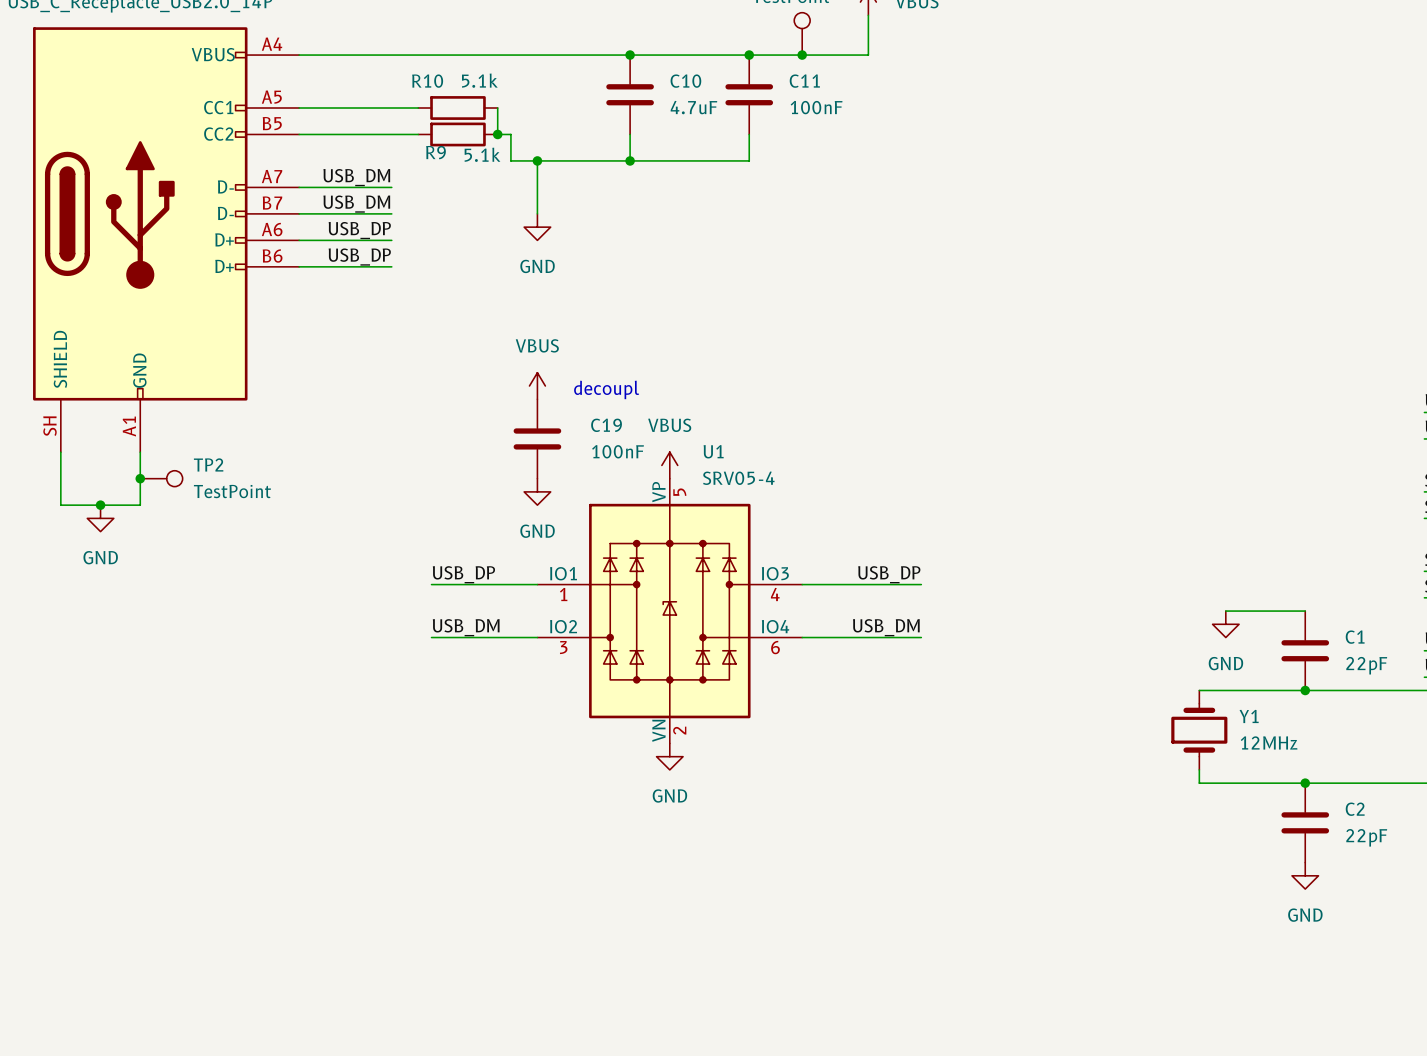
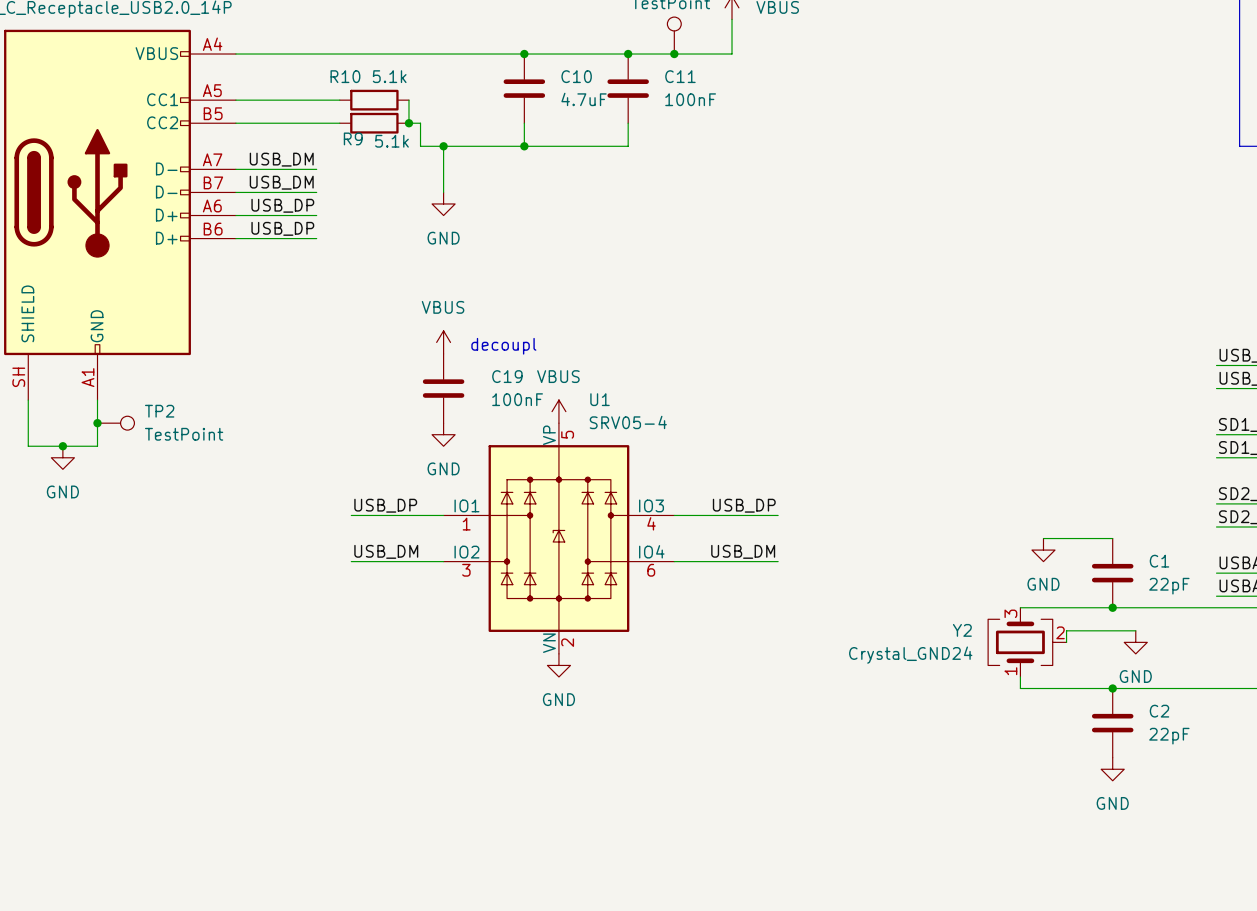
wire: none -> (1135, 630) (1066, 630) (1066, 642)
Y1: 12MHz (1199, 730) -> none
Y2: none -> Crystal_GND24 (1027, 642)
power symbol: none -> GND (1135, 642)

